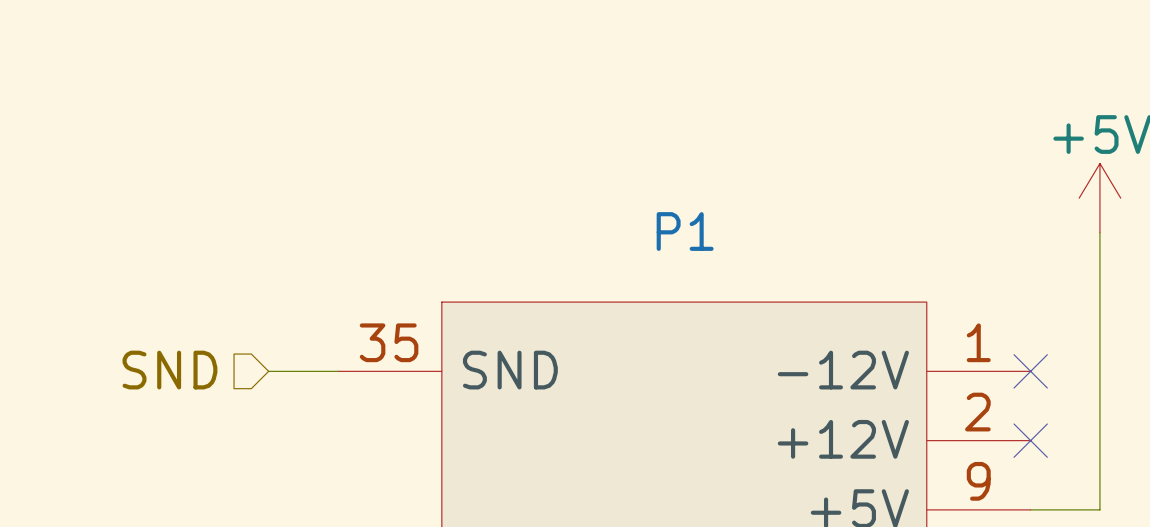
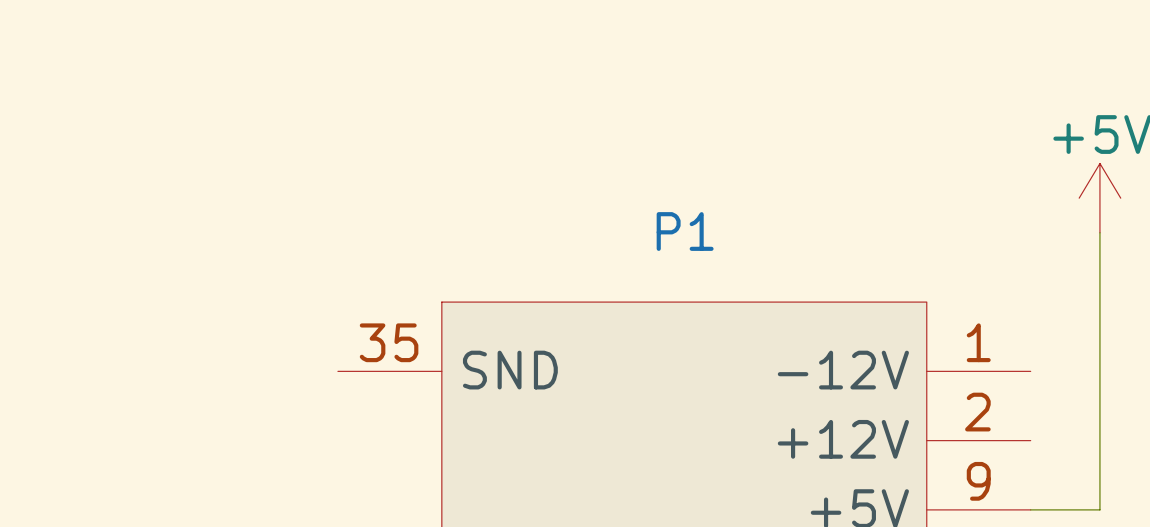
hierarchical label: SND (169, 370) -> none
wire: (268, 371) (337, 371) -> none
no-connect mark: (1030, 371) -> none
no-connect mark: (1030, 440) -> none

